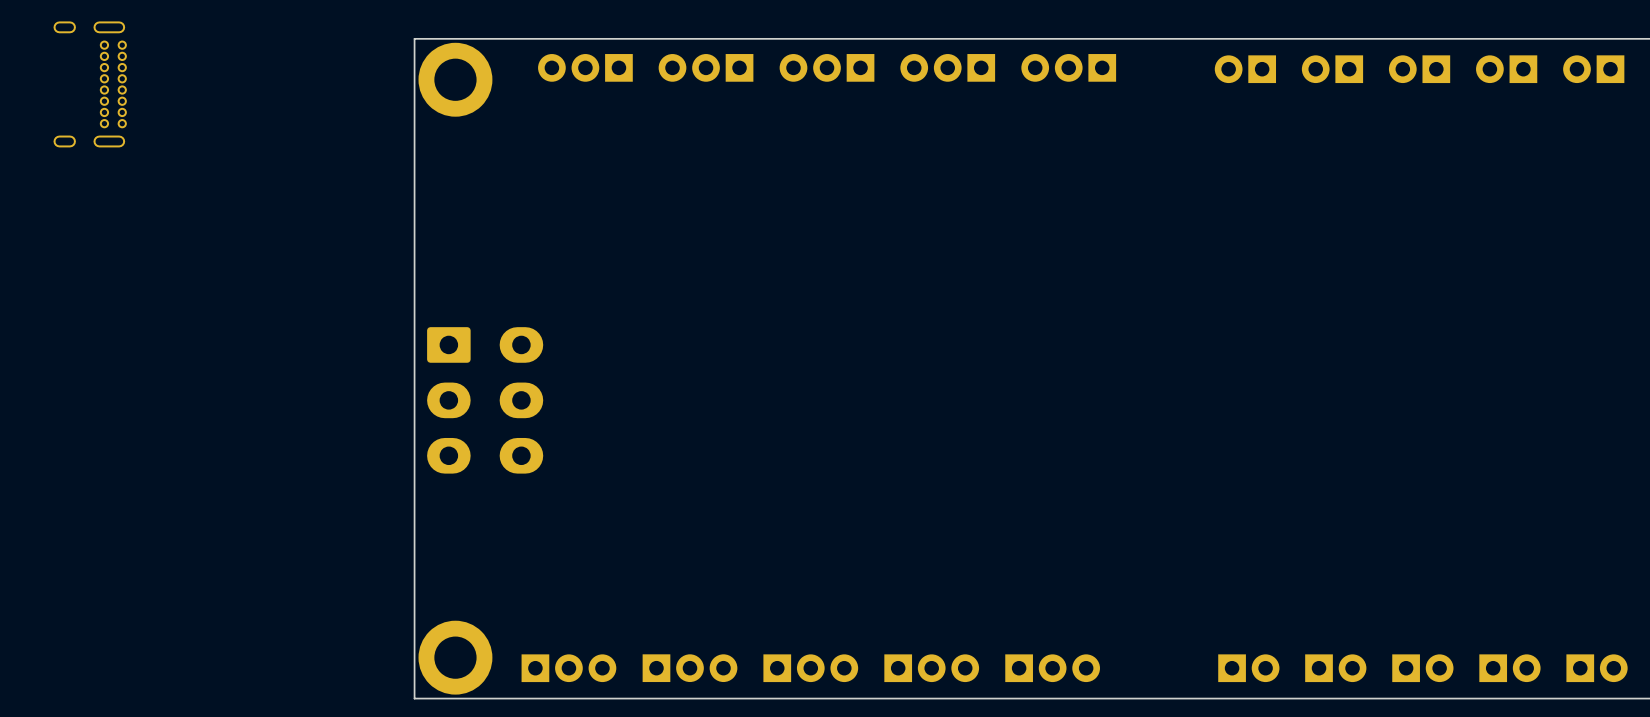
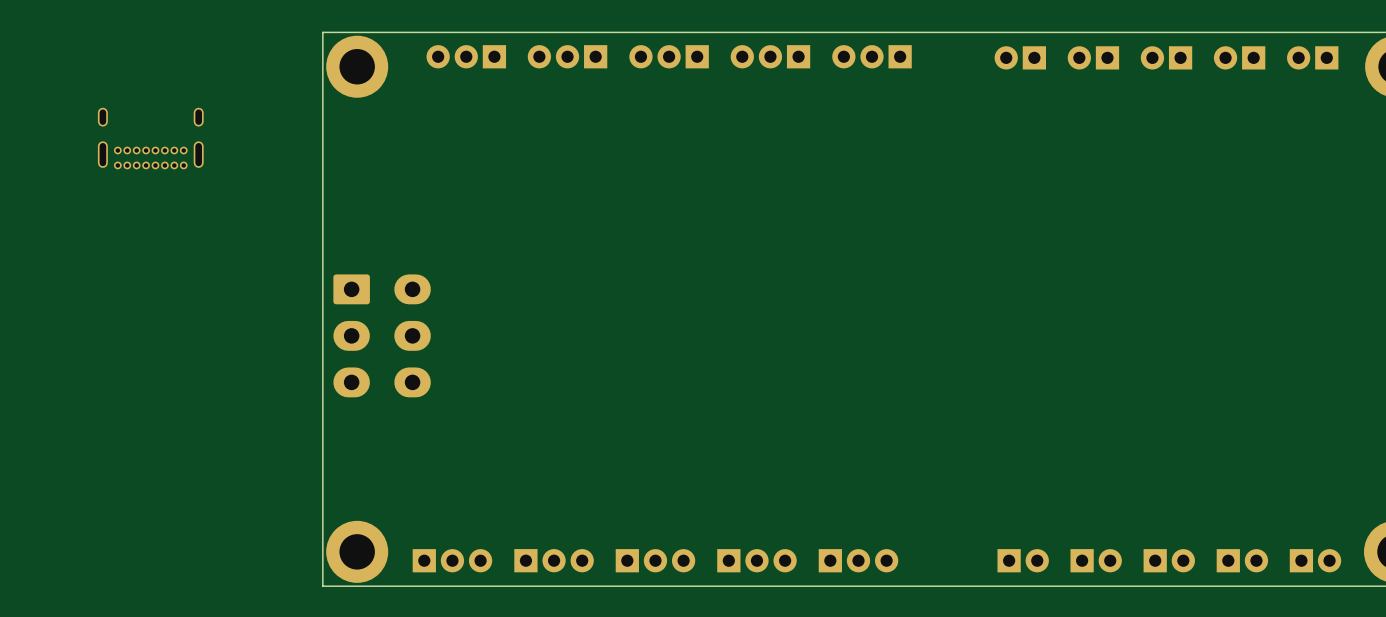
part rotation: 0° (90, 84) -> 90° clockwise (150, 138)
part position: (90, 84) -> (150, 138)

